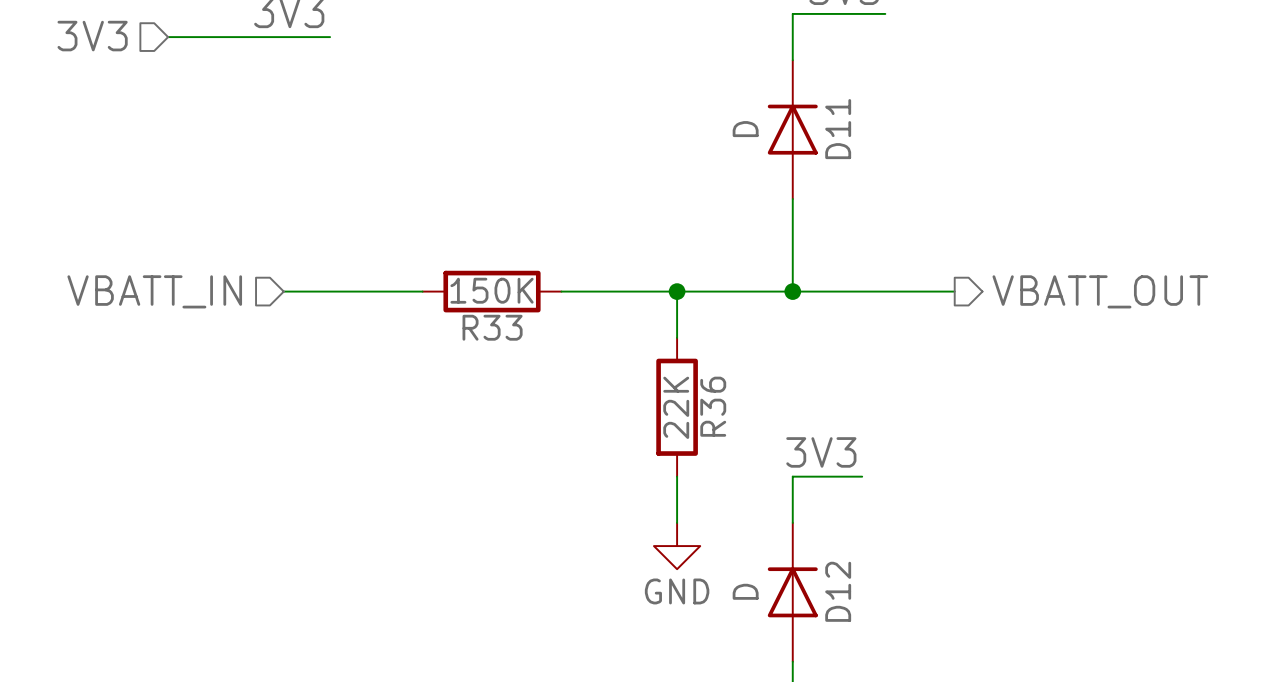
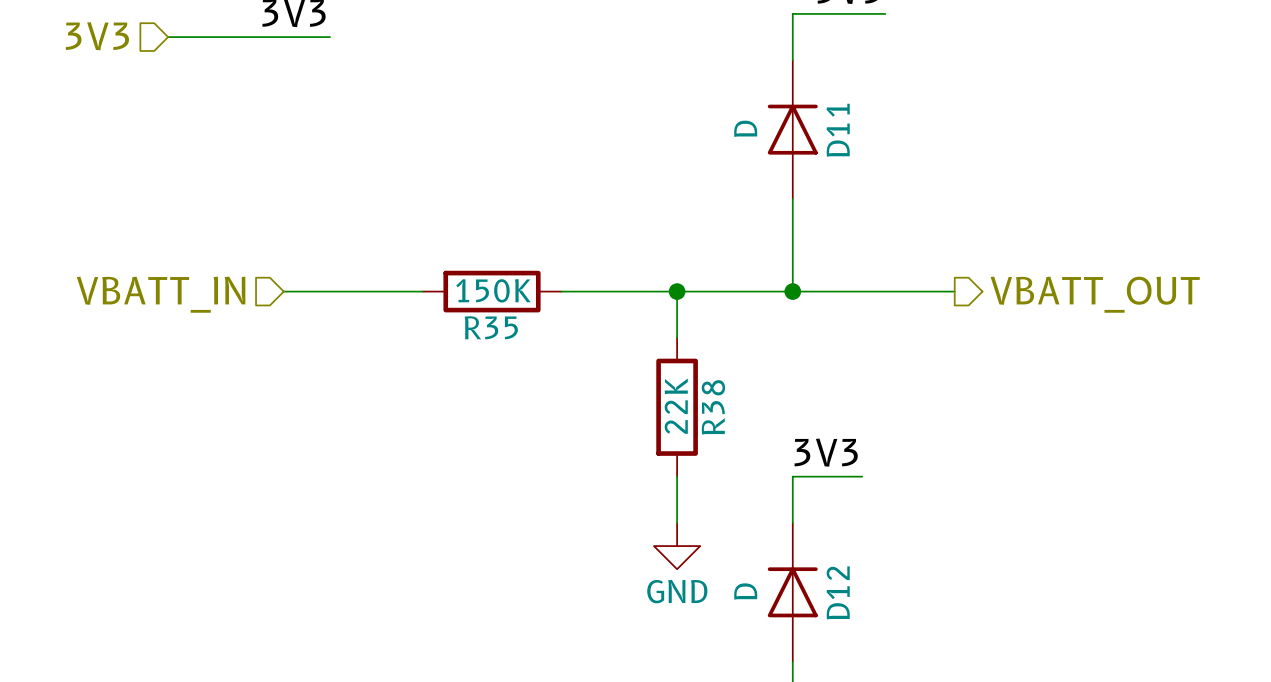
R33 name: R33 (492, 327) -> R35 (491, 327)
R36 name: R36 (713, 406) -> R38 (713, 407)

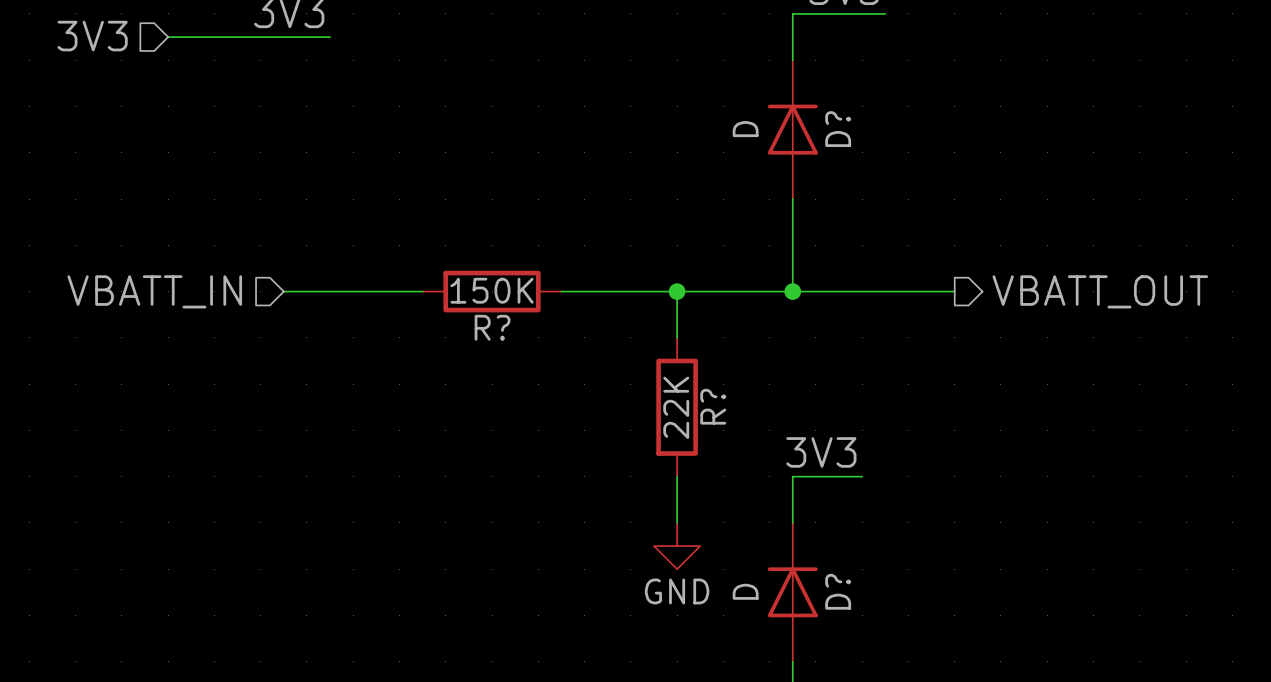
D11 name: D11 (838, 130) -> D? (838, 129)
R35 name: R35 (491, 327) -> R? (492, 327)
R38 name: R38 (713, 407) -> R? (713, 406)
D12 name: D12 (838, 592) -> D? (838, 591)

